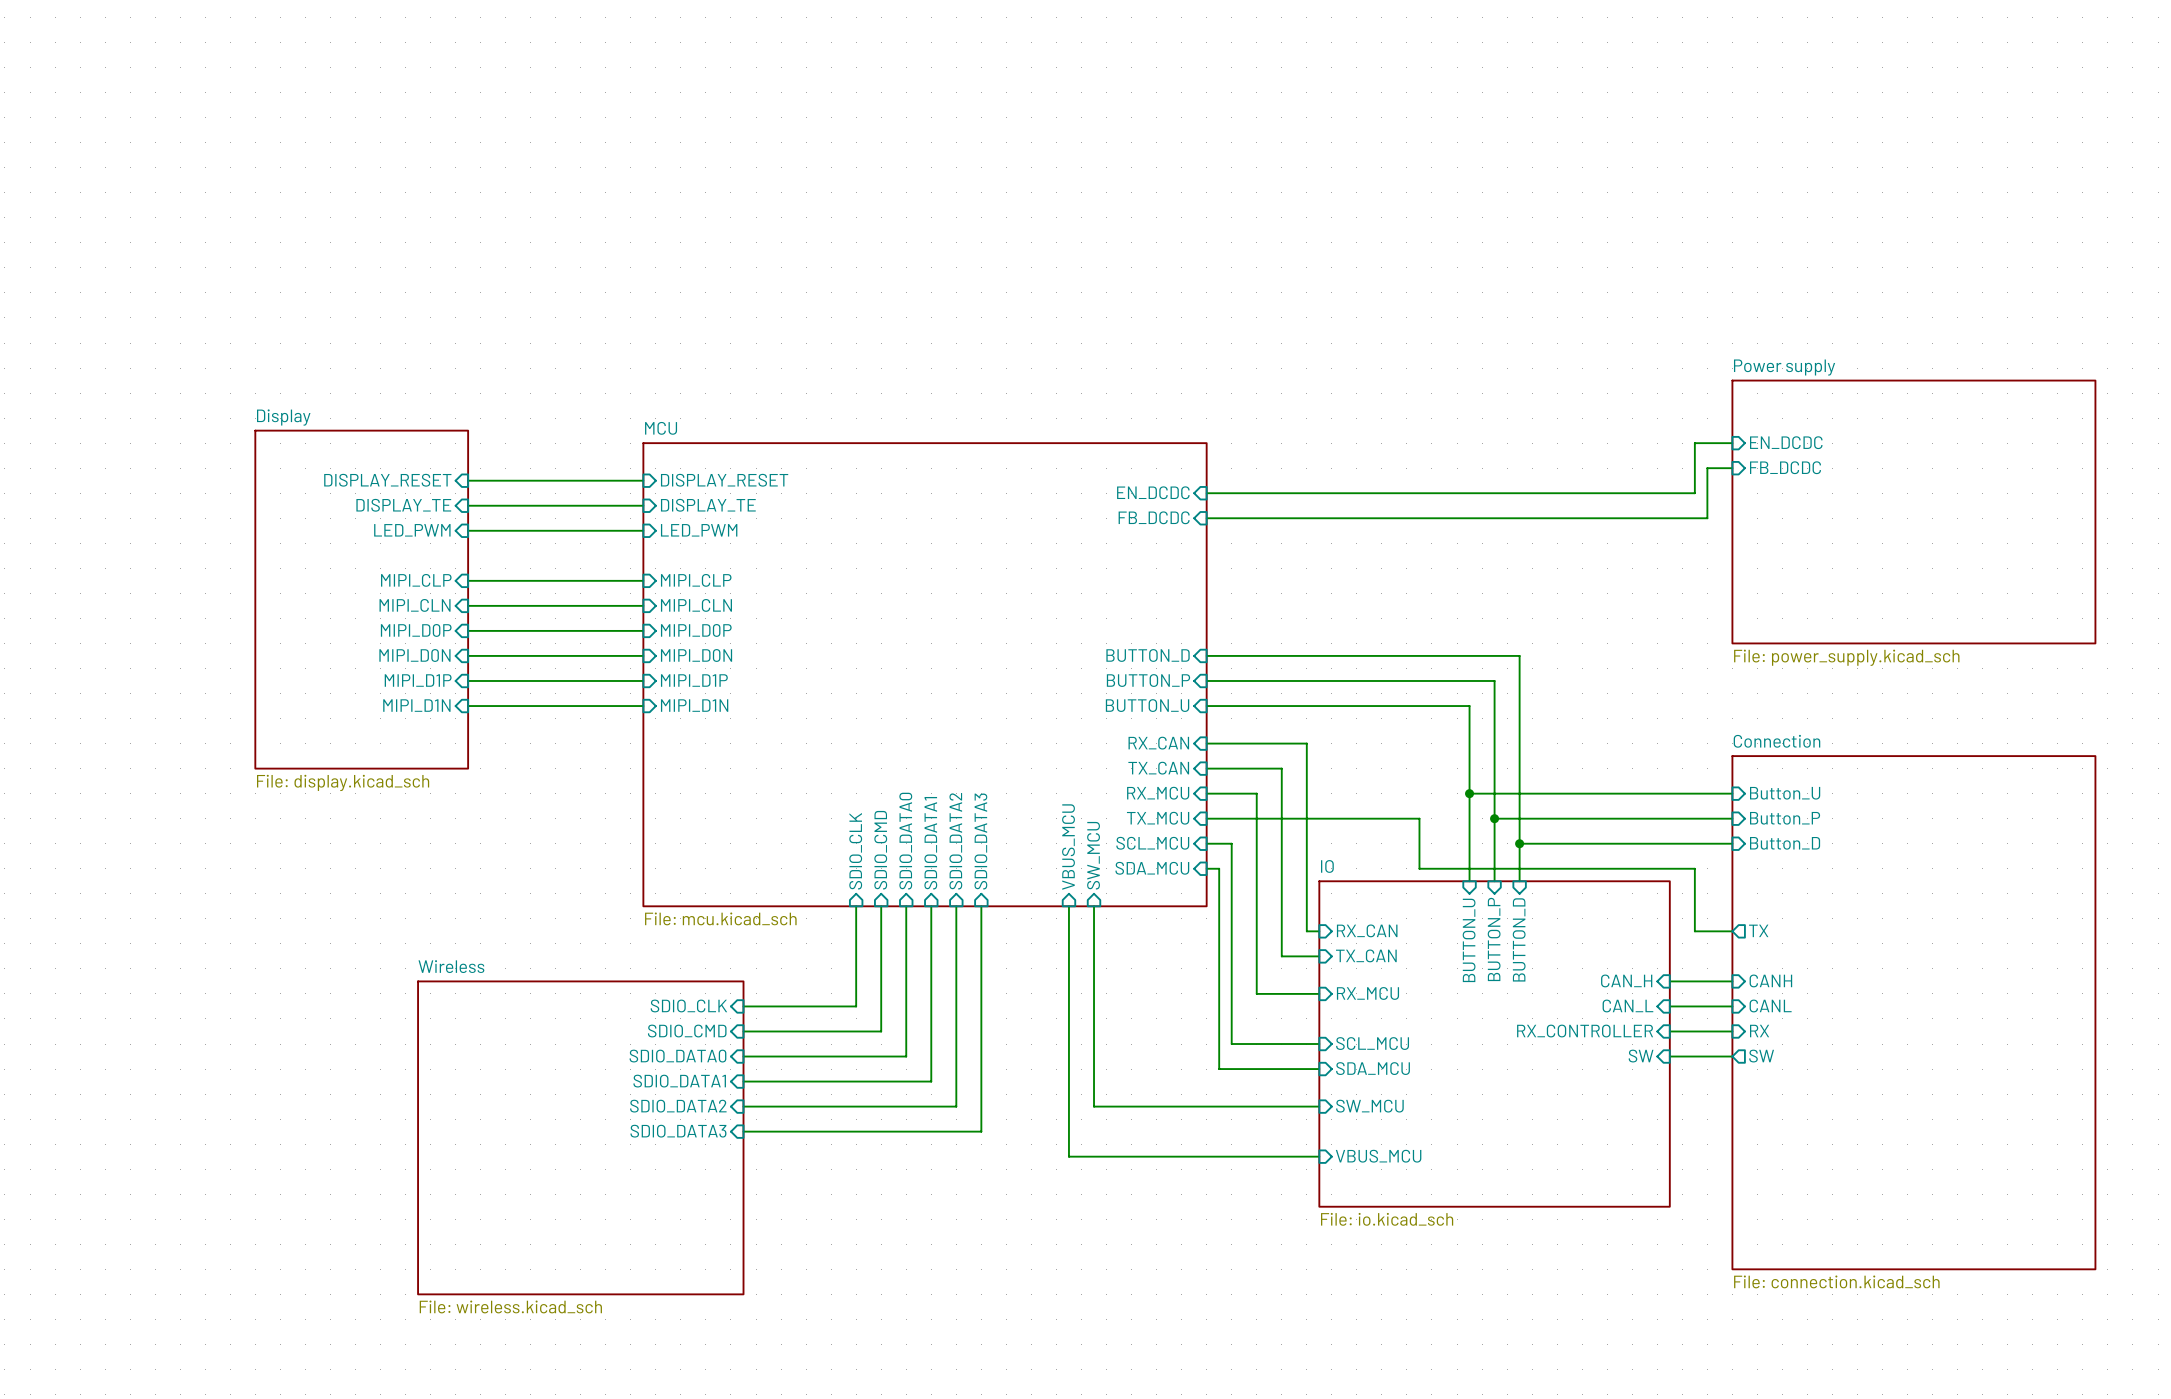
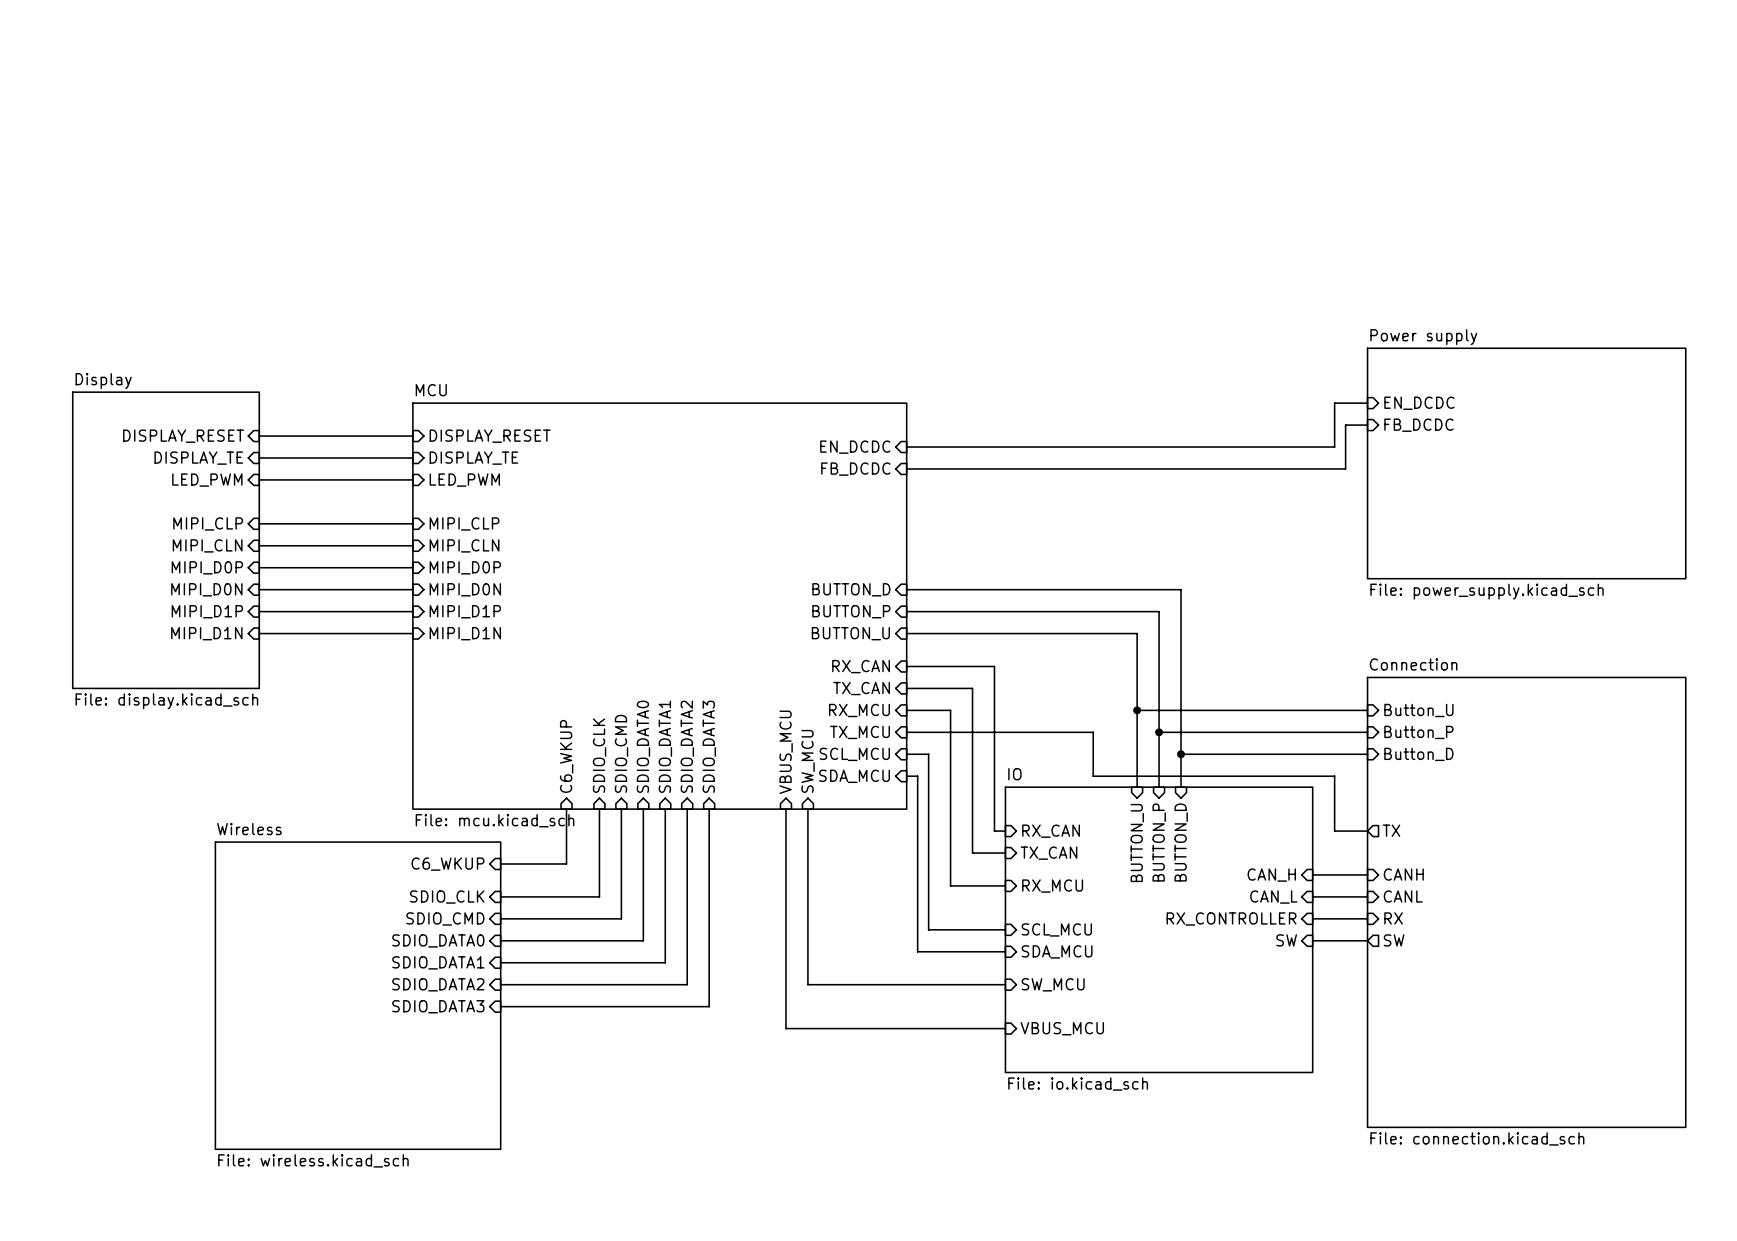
sheet pin: none -> C6_WKUP (566, 756)
wire: none -> (566, 809) (566, 863) (500, 863)
sheet pin: none -> C6_WKUP (448, 864)
sheet Wireless: none -> File: wireless.kicad_sch (358, 995)
sheet Wireless: File: wireless.kicad_sch (580, 1137) -> none

